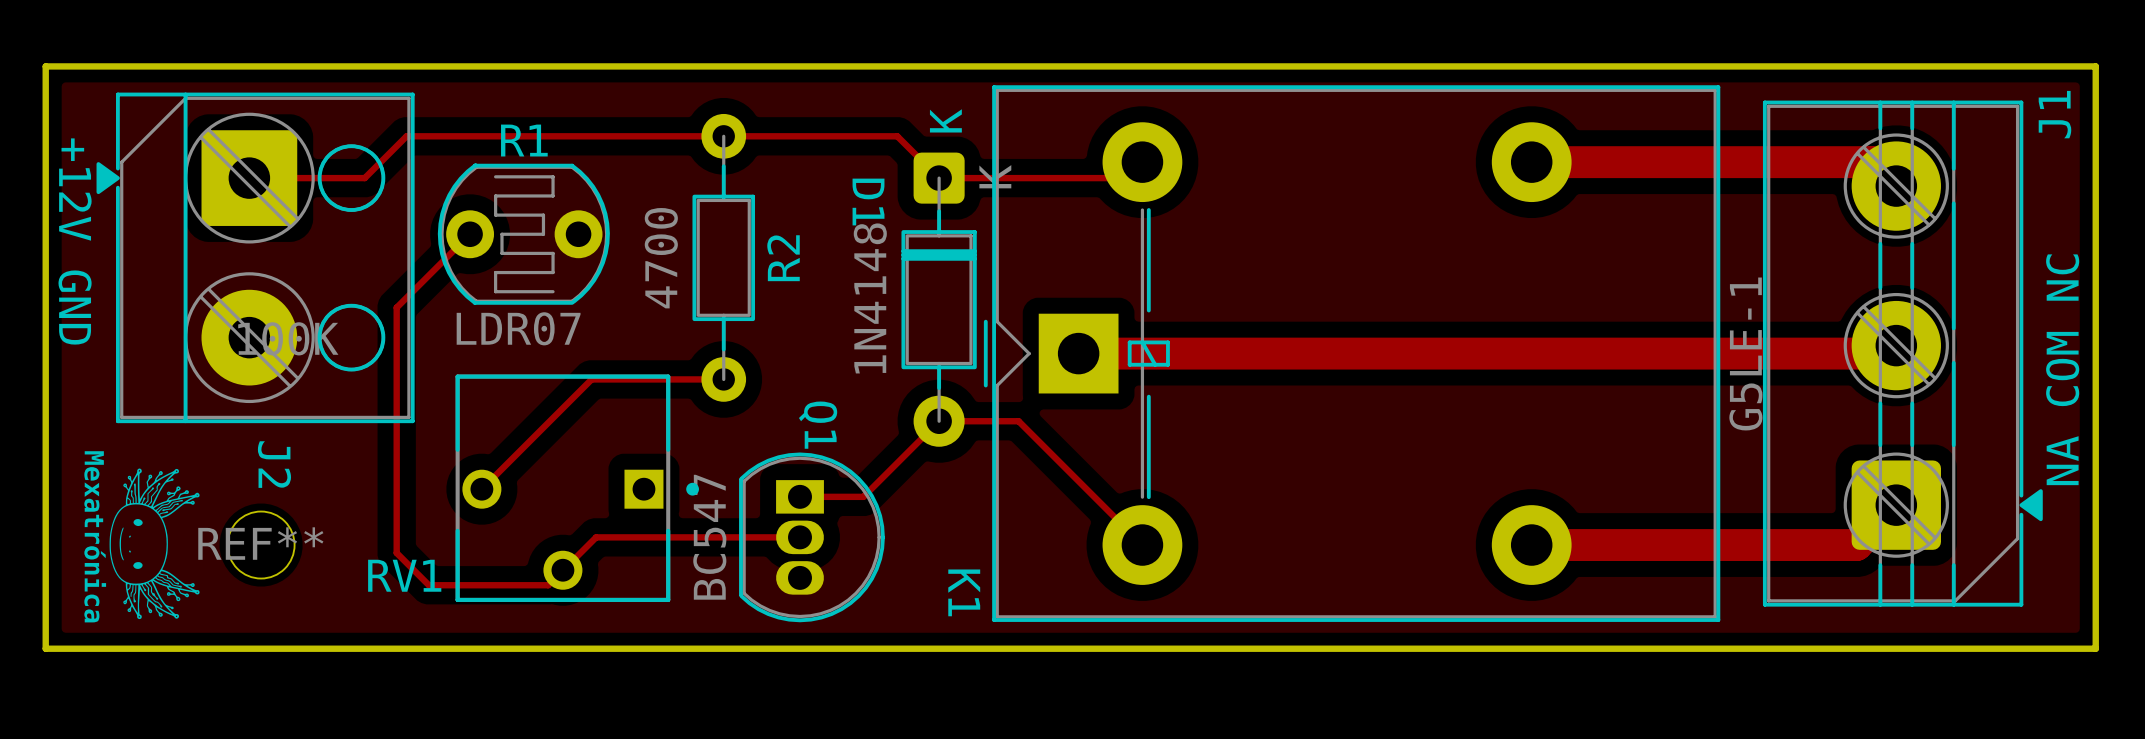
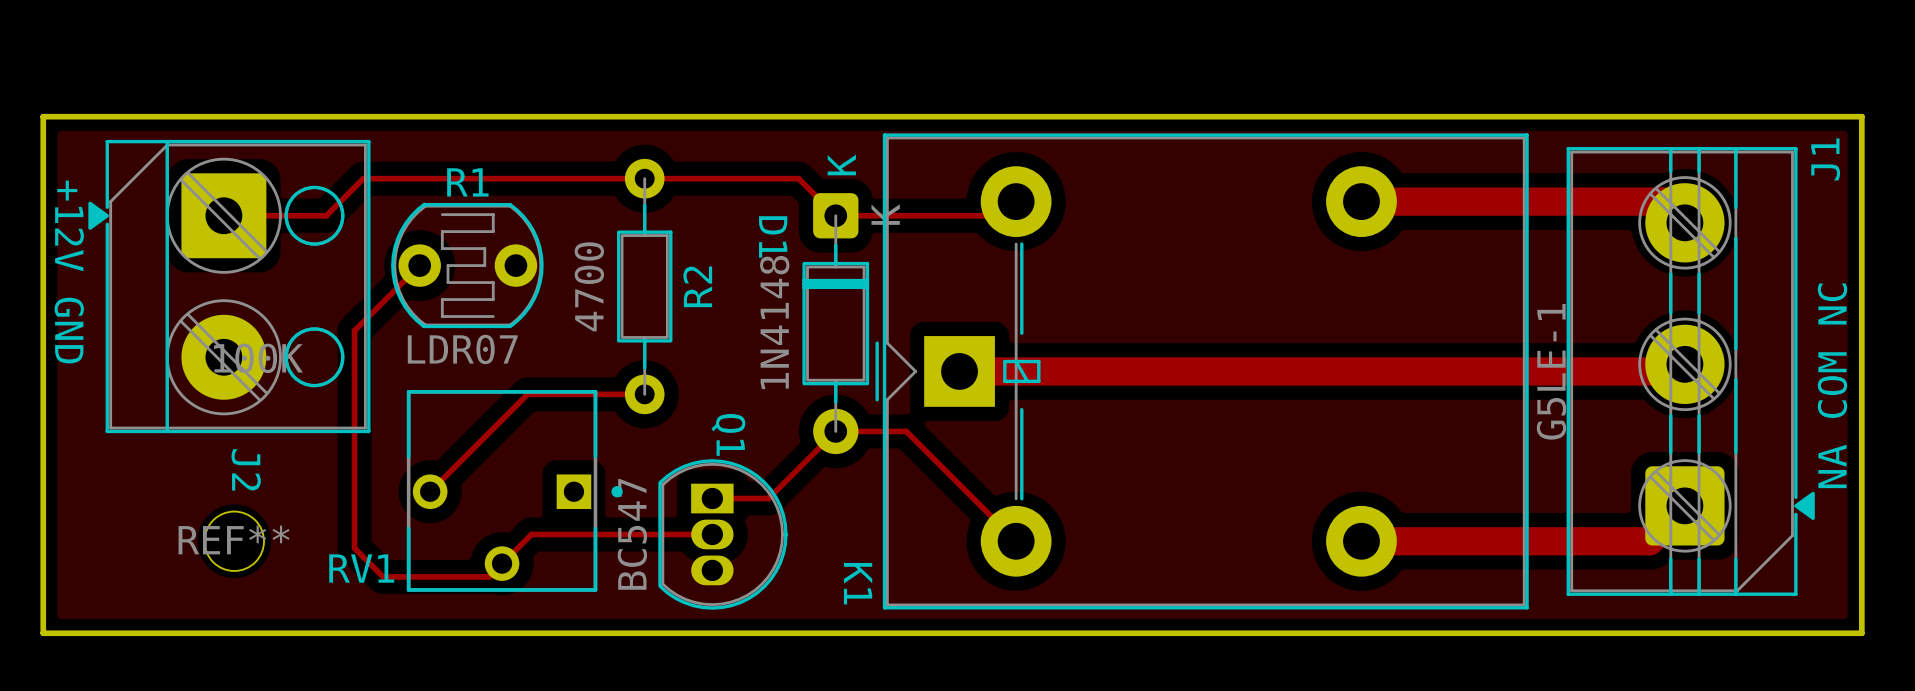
drawing: [109, 468, 200, 620] -> none

